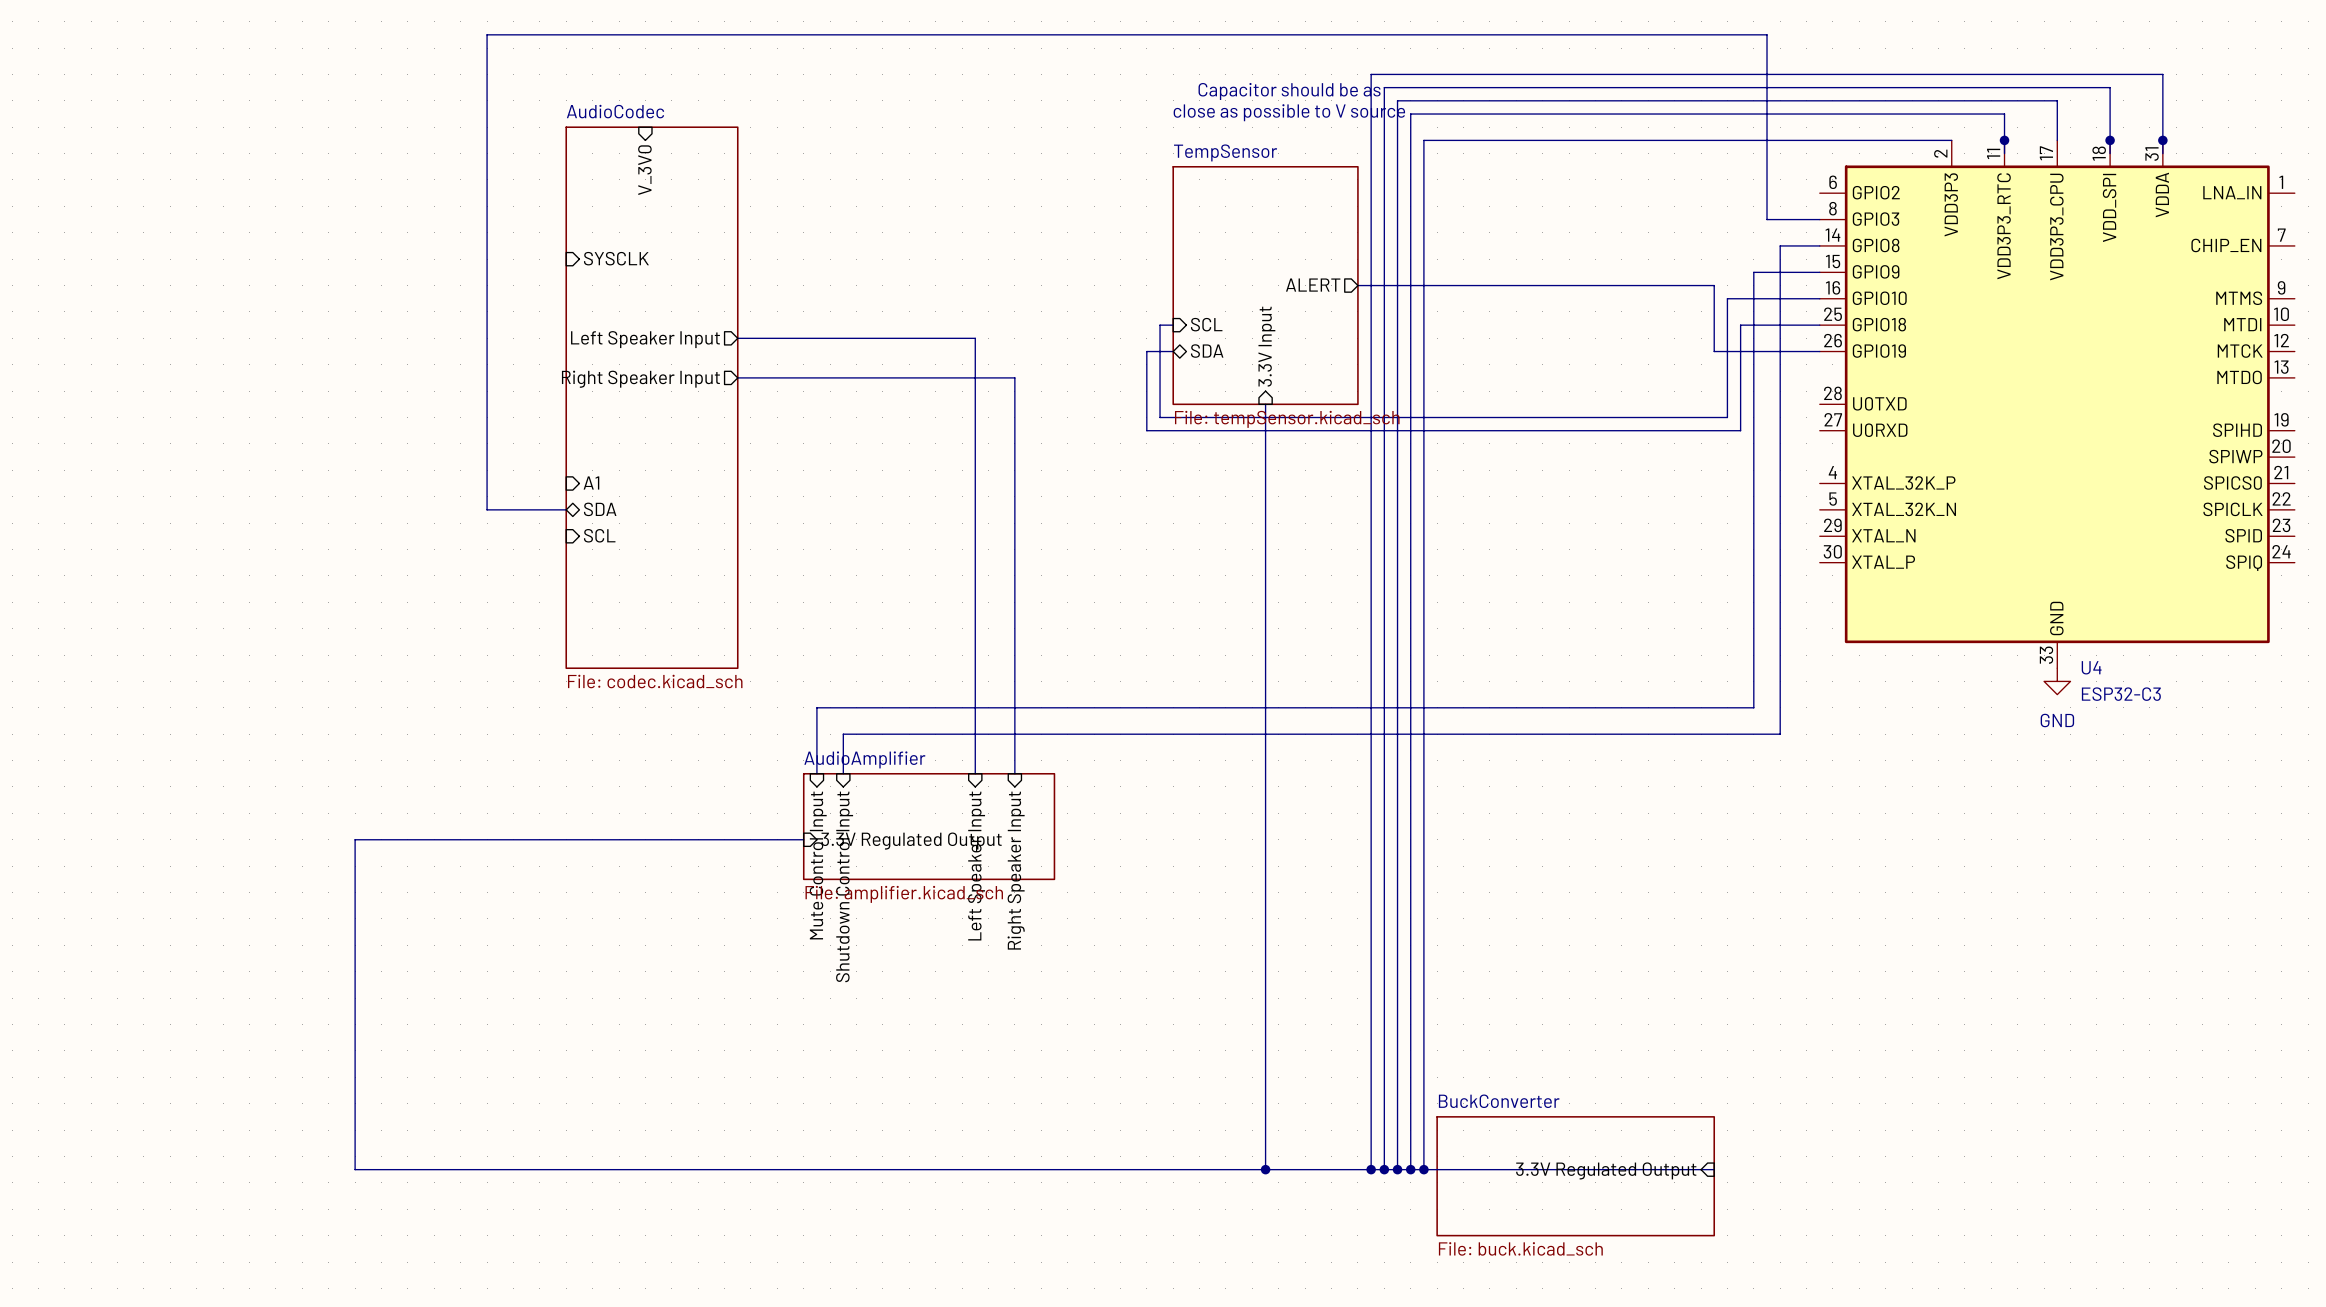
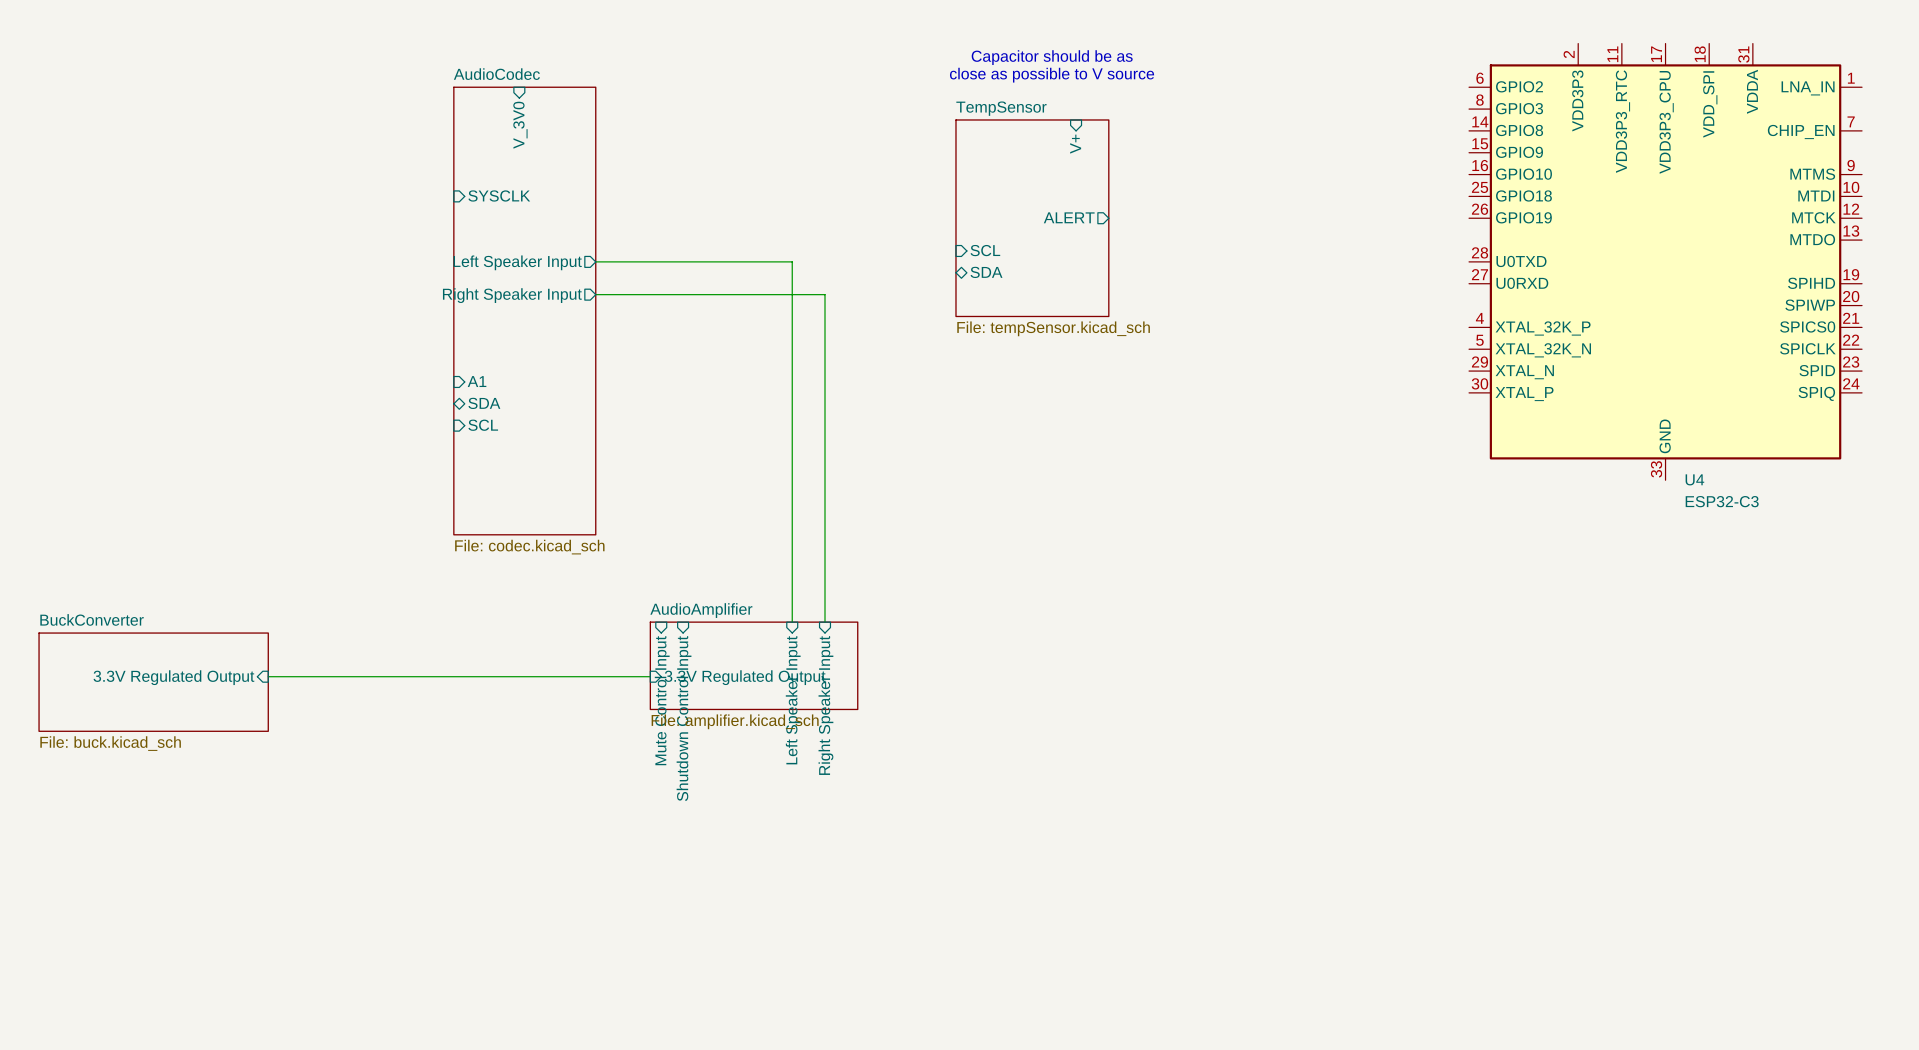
wire: (1951, 140) (1423, 140) (1423, 1169) -> none
junction: (2004, 140) -> none
wire: (2057, 140) (2057, 100) (1397, 100) (1397, 1169) -> none
junction: (2110, 140) -> none
junction: (2162, 140) -> none
wire: (2004, 153) (2004, 114) (1410, 114) (1410, 1169) -> none
wire: (2110, 153) (2110, 87) (1384, 87) (1384, 1169) -> none
wire: (2162, 153) (2162, 74) (1371, 74) (1371, 1169) -> none
sheet pin: none -> V+ (1075, 144)
wire: (1819, 219) (1767, 219) (1767, 34) (487, 34) (487, 509) (566, 509) -> none
wire: (1819, 245) (1780, 245) (1780, 734) (843, 734) (843, 773) -> none
wire: (1819, 272) (1753, 272) (1753, 707) (816, 707) (816, 773) -> none
wire: (1357, 285) (1714, 285) (1714, 351) (1819, 351) -> none
wire: (1819, 298) (1727, 298) (1727, 417) (1160, 417) (1160, 325) (1173, 325) -> none
wire: (1819, 325) (1740, 325) (1740, 430) (1146, 430) (1146, 351) (1173, 351) -> none
sheet pin: 3.3V Input (1266, 346) -> none
wire: (1265, 404) (1265, 1169) -> none
U4 position: (2057, 404) -> (1665, 261)
power symbol: GND (2057, 681) -> none
wire: (355, 839) (355, 1169) (1714, 1169) -> (279, 676) (268, 676)
sheet pin: none -> 3.3V Regulated Output (173, 677)
sheet BuckConverter: none -> File: buck.kicad_sch (153, 682)
junction: (1265, 1169) -> none
junction: (1371, 1169) -> none
junction: (1384, 1169) -> none
junction: (1397, 1169) -> none
junction: (1410, 1169) -> none
junction: (1423, 1169) -> none
sheet pin: 3.3V Regulated Output (1606, 1170) -> none
sheet BuckConverter: File: buck.kicad_sch (1575, 1176) -> none

